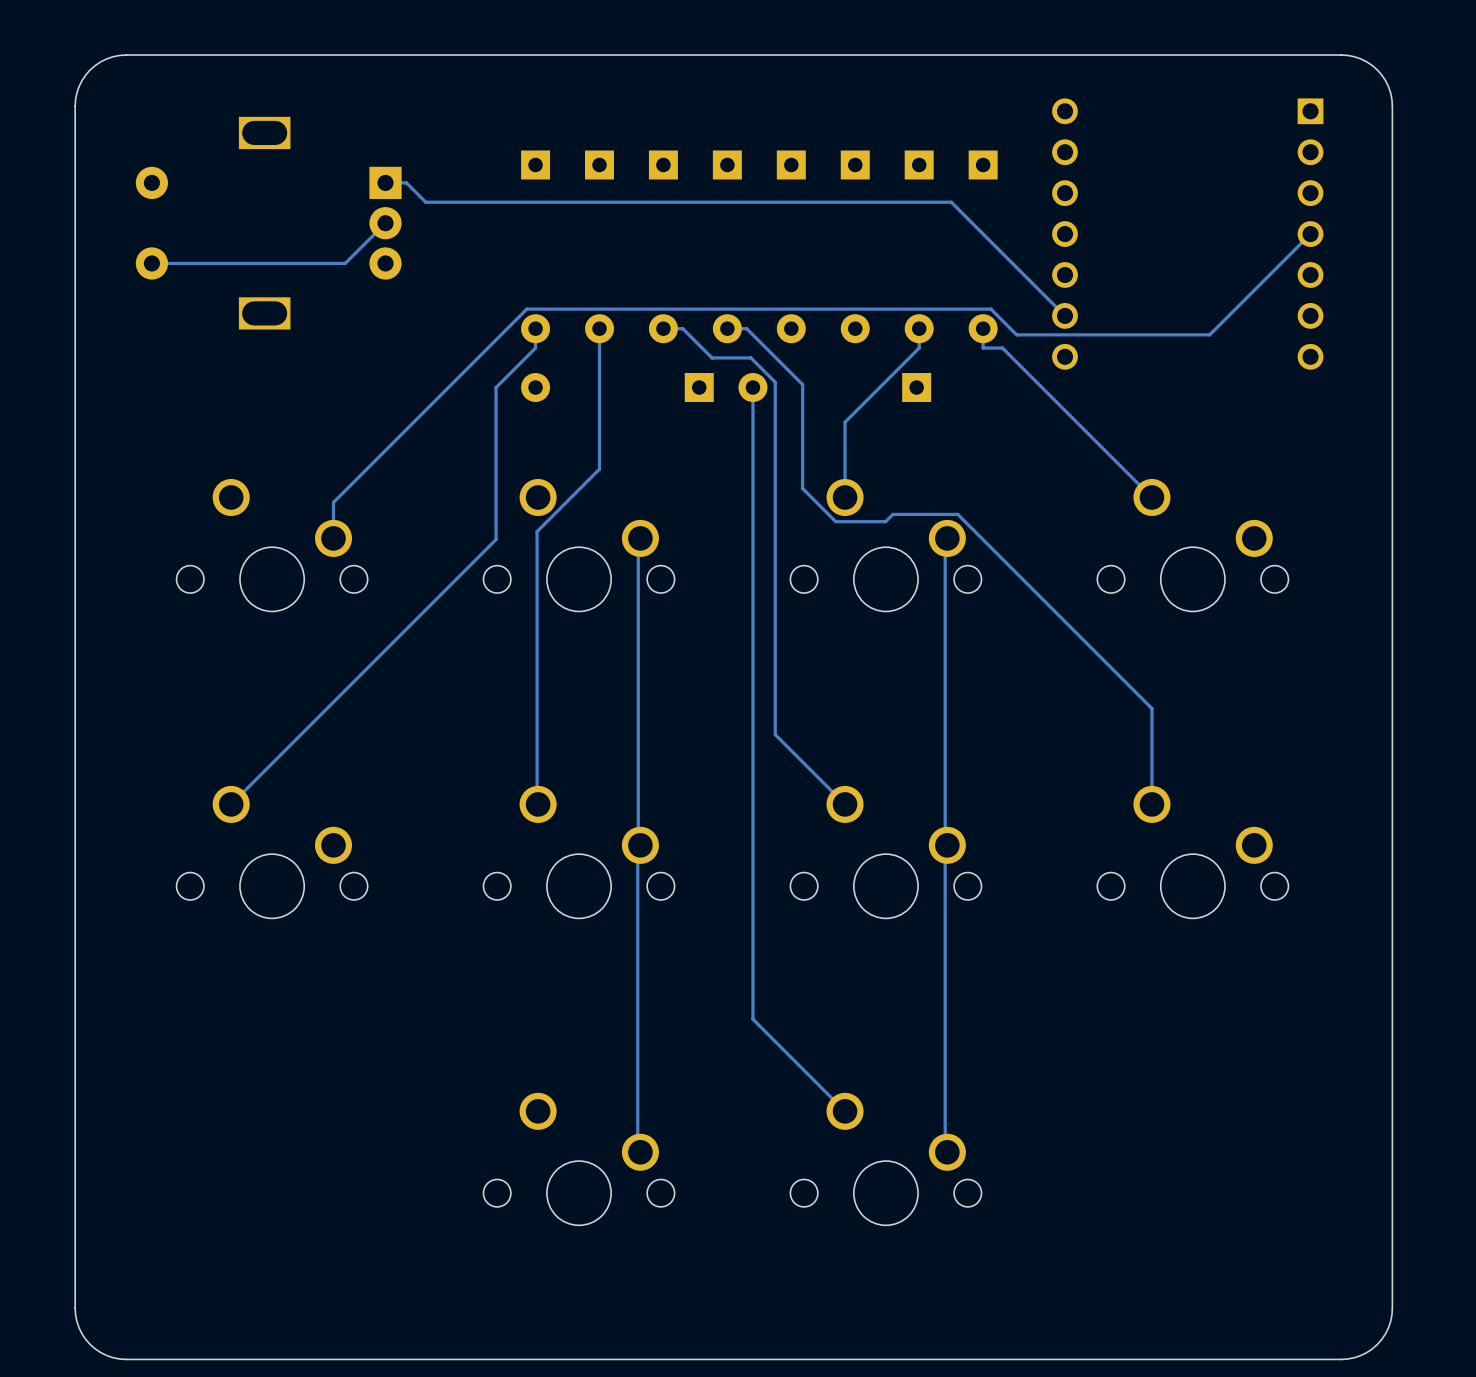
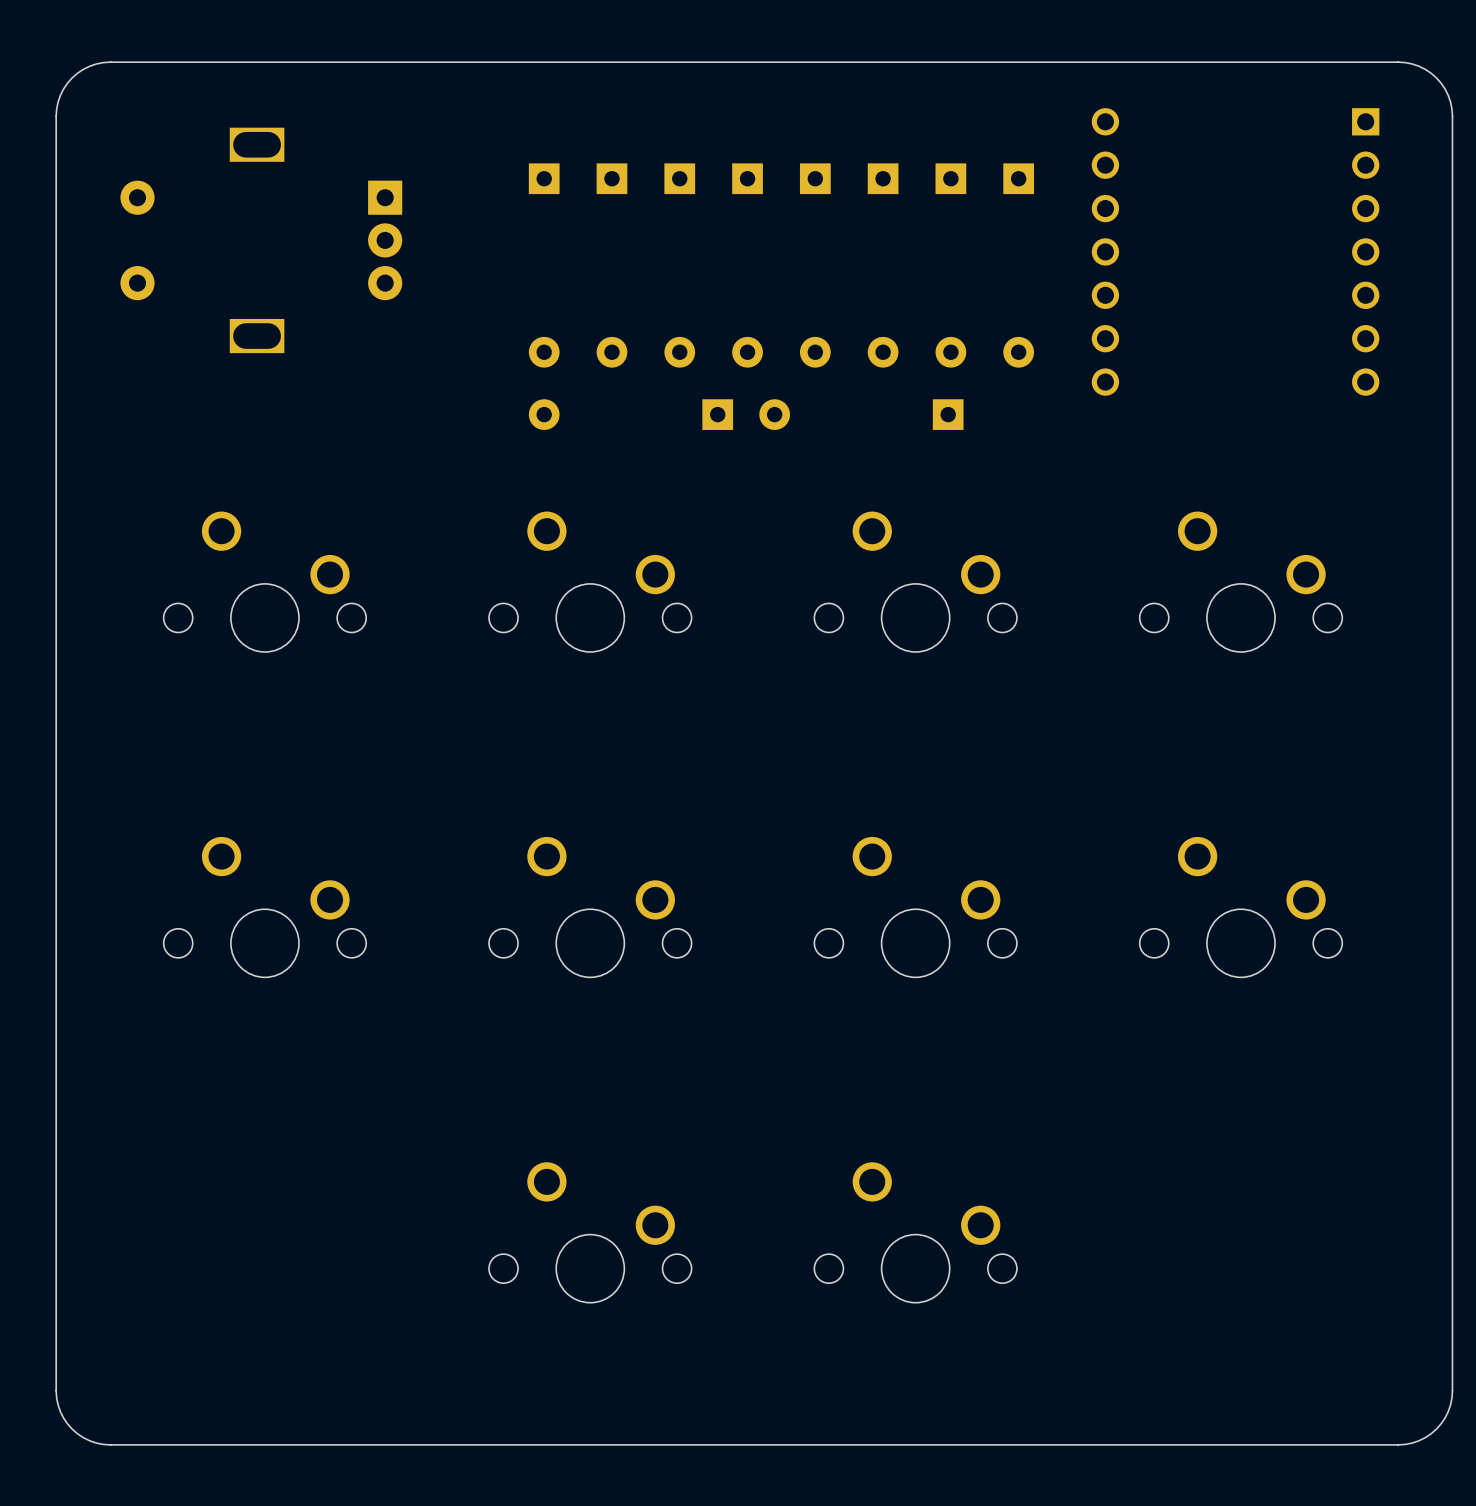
track: (385, 182) (406, 182) (425, 202) (951, 202) (1064, 315) -> none
track: (385, 223) (345, 263) (151, 263) -> none
track: (1310, 234) (1209, 334) (1016, 334) (990, 309) (526, 309) (333, 502) (333, 538) -> none
track: (535, 328) (535, 348) (496, 387) (496, 539) (231, 804) -> none
track: (599, 328) (599, 469) (537, 531) (538, 804) -> none
track: (663, 328) (682, 328) (712, 357) (750, 357) (775, 382) (775, 734) (845, 804) -> none
track: (727, 328) (746, 328) (802, 384) (802, 488) (835, 521) (885, 521) (892, 514) (957, 514) (1151, 708) (1151, 804) -> none
track: (919, 328) (919, 348) (845, 422) (845, 497) -> none
track: (983, 328) (983, 348) (1002, 348) (1151, 497) -> none
track: (752, 387) (752, 1019) (845, 1111) -> none
track: (640, 538) (638, 540) (638, 843) (640, 845) (637, 848) (637, 1149) (640, 1152) -> none
track: (947, 538) (945, 540) (945, 843) (947, 845) (945, 847) (945, 1150) (947, 1152) -> none

